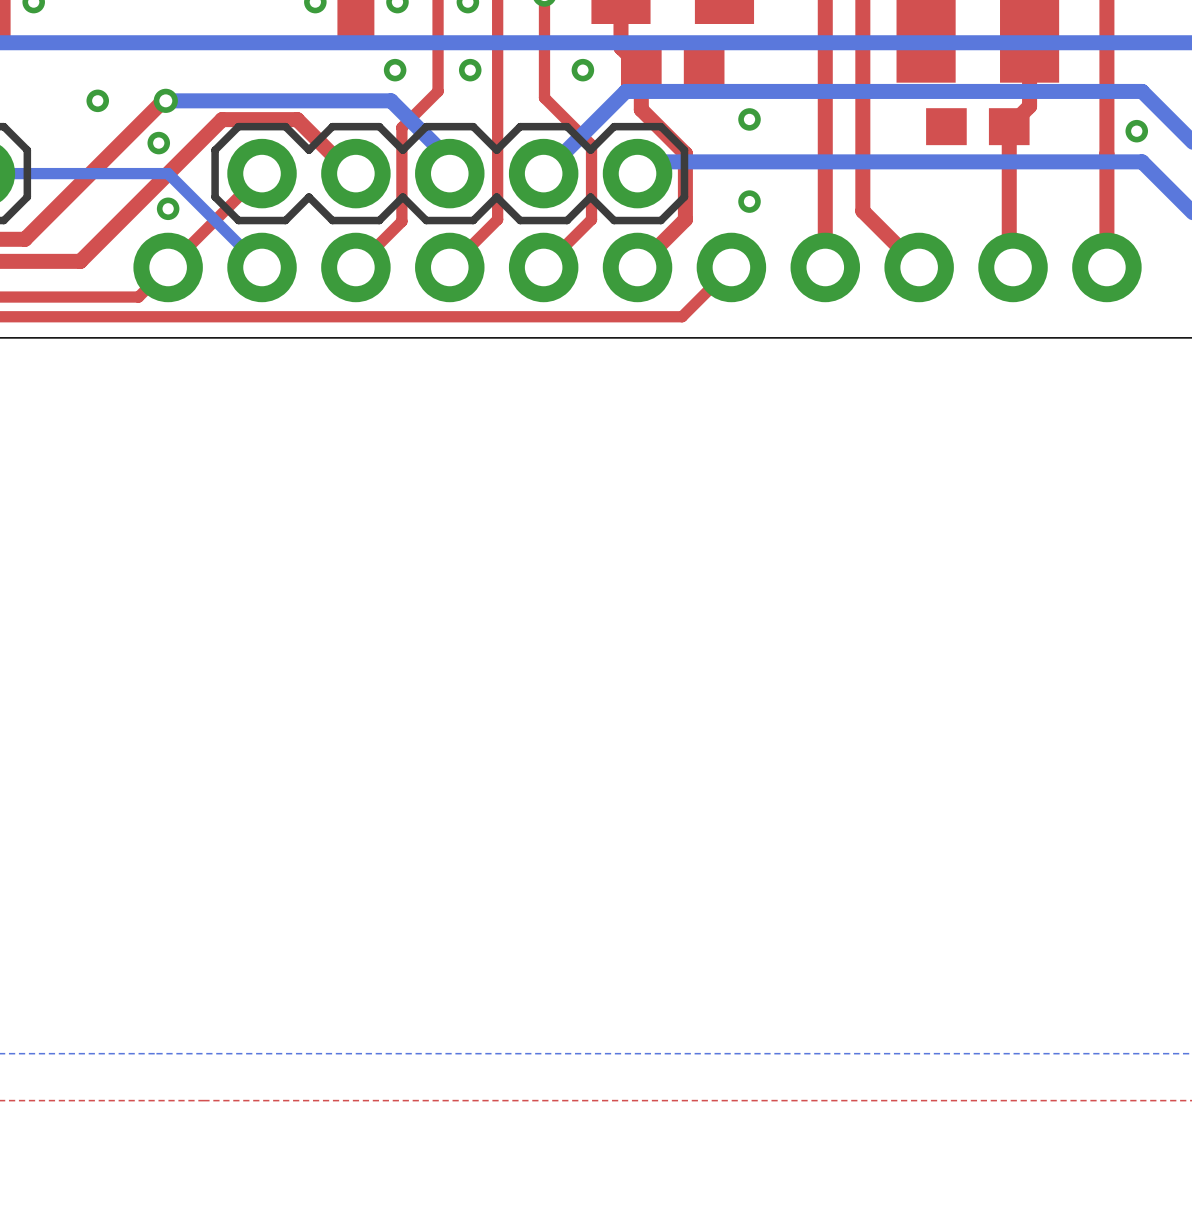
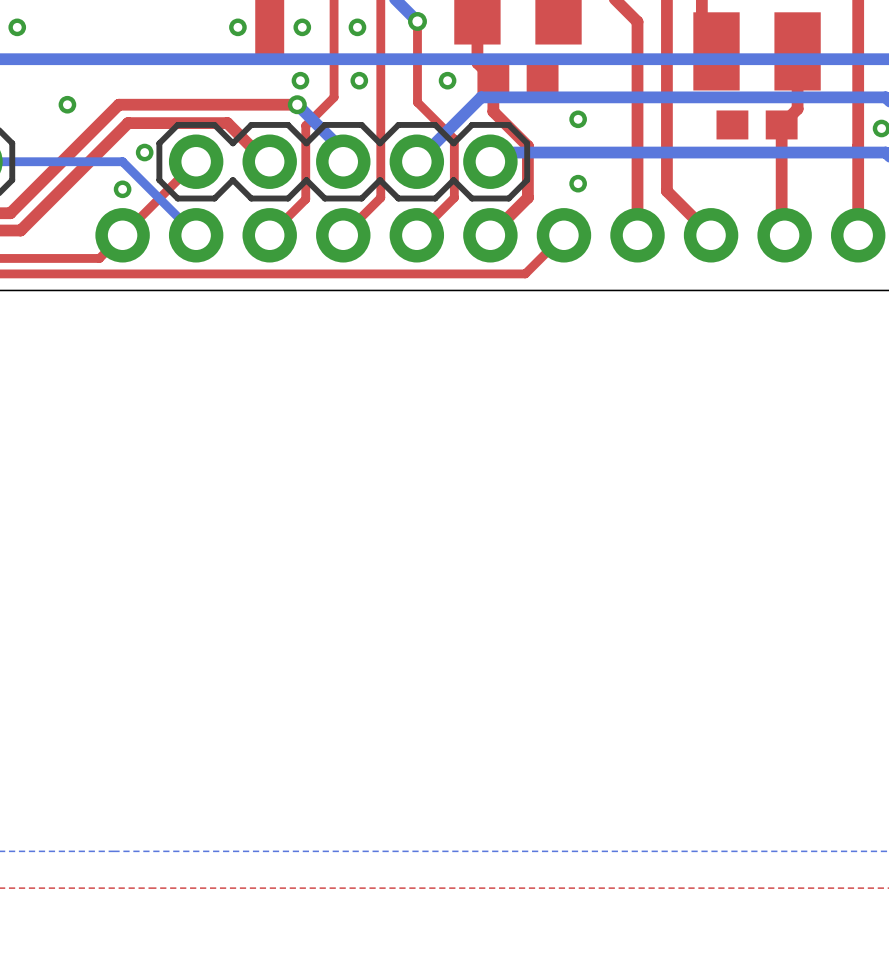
via: (165, 100) -> none
top track: none -> (297, 104) (120, 104)
bottom track: (391, 100) (165, 100) -> none
via: none -> (297, 104)
top track: (301, 124) (297, 119) (222, 119) (80, 261) (38, 261) -> (227, 123) (128, 123) (20, 230)
via position: (158, 143) -> (144, 152)

